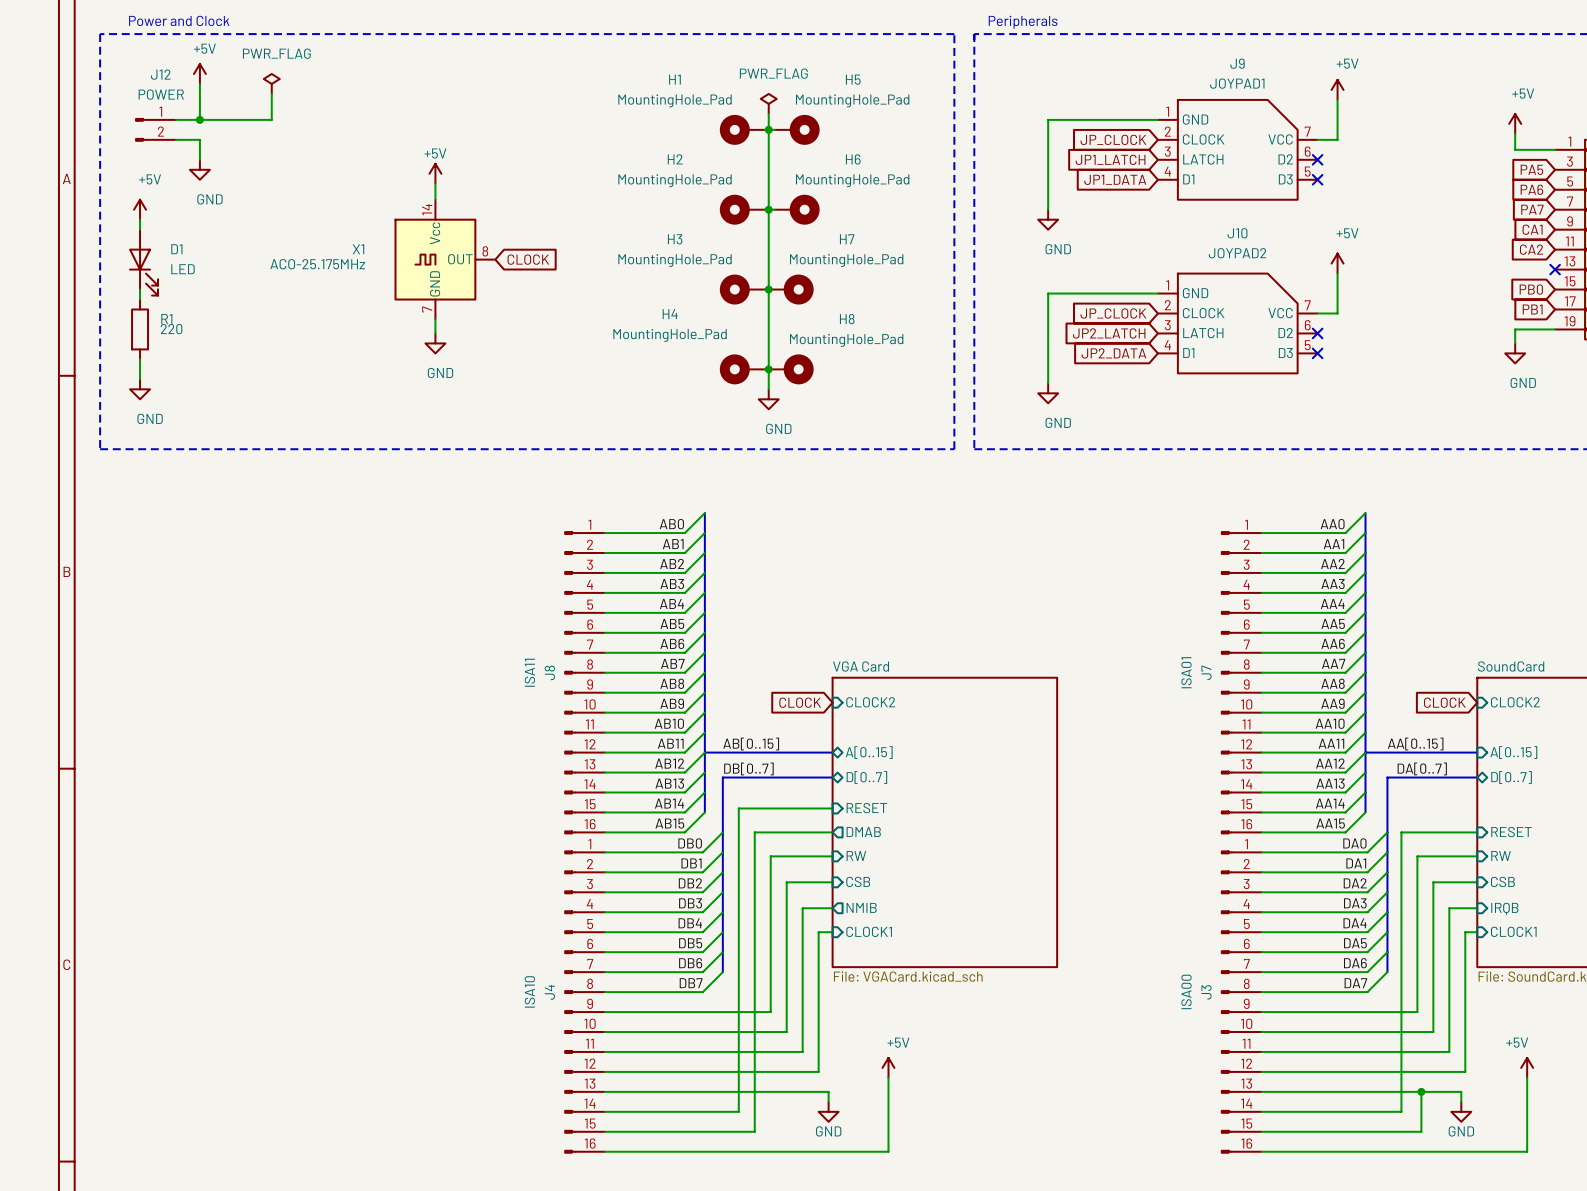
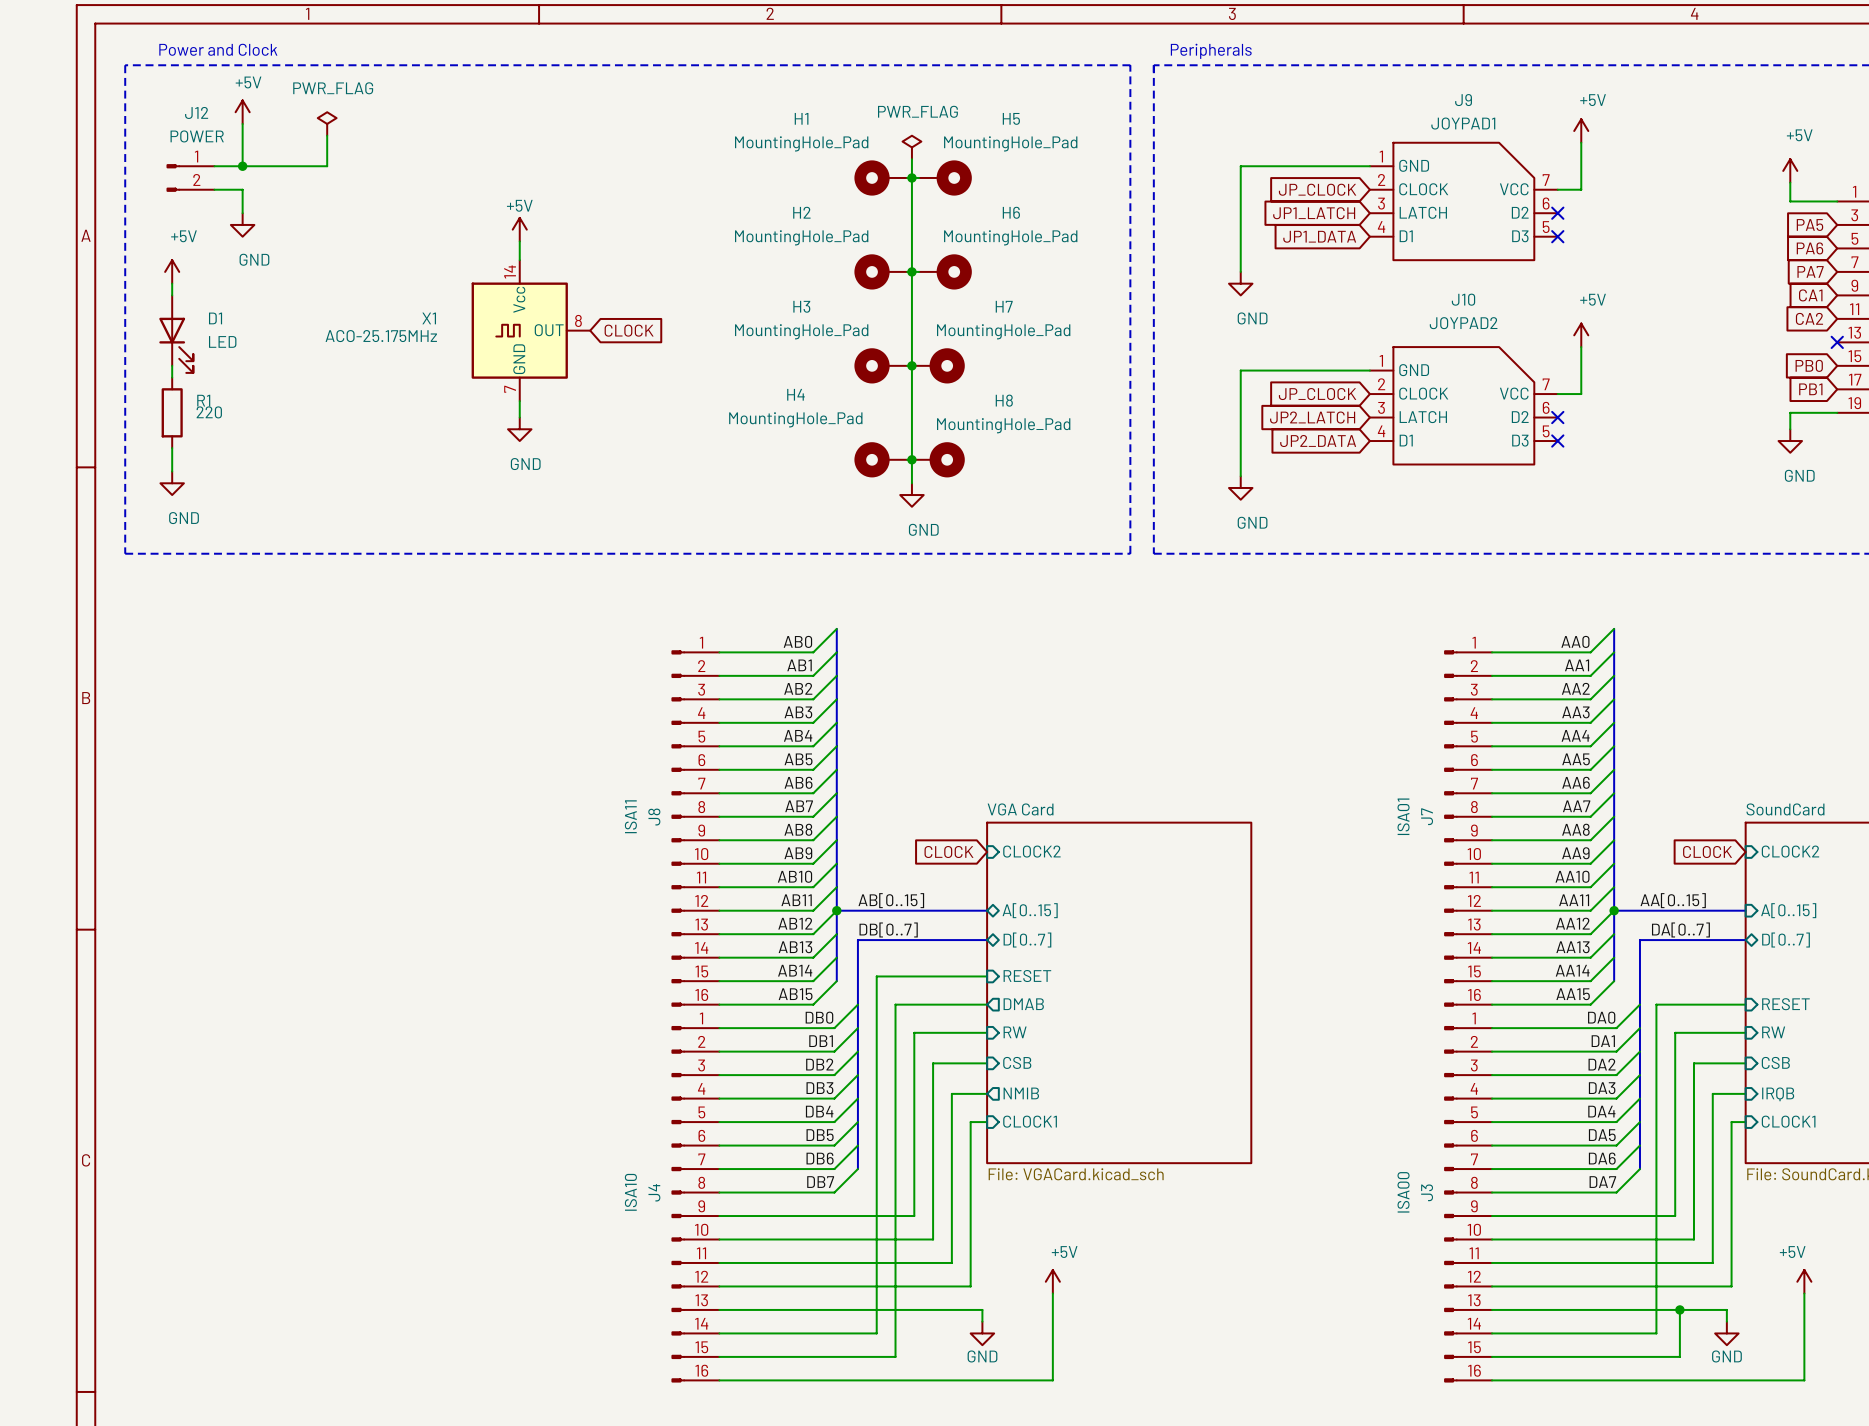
junction: none -> (836, 910)
junction: none -> (1614, 910)

